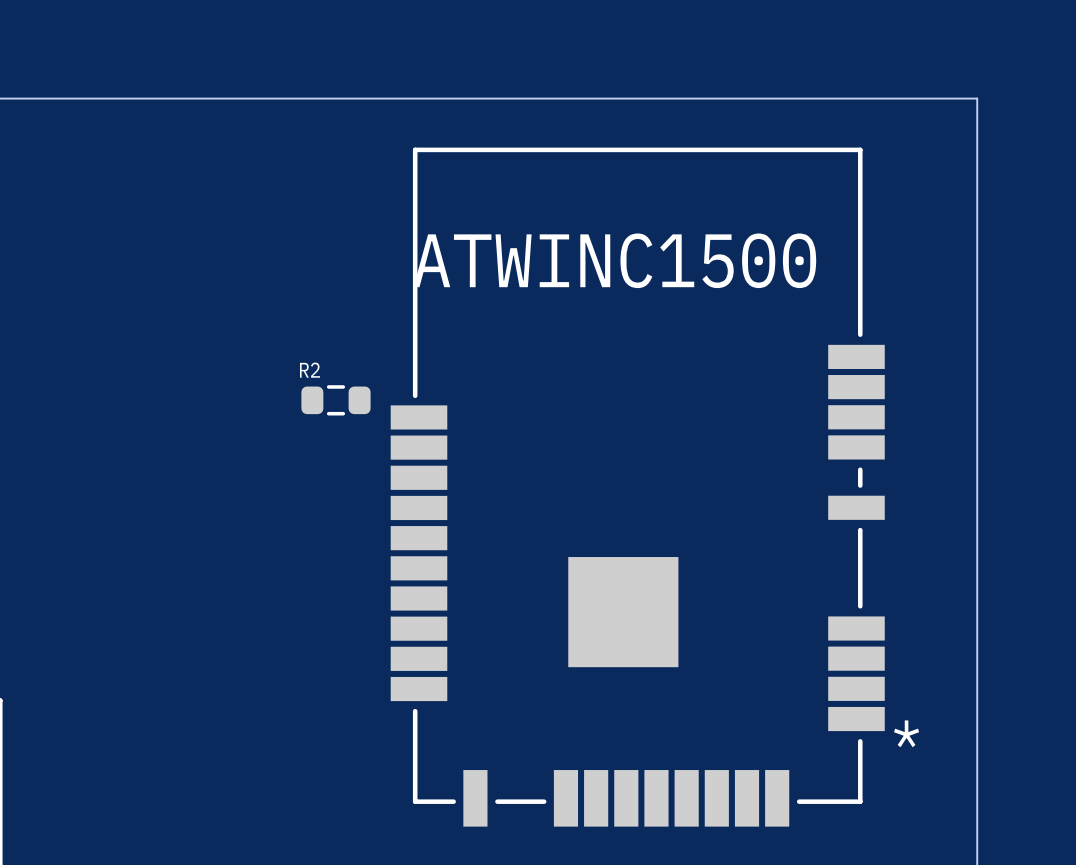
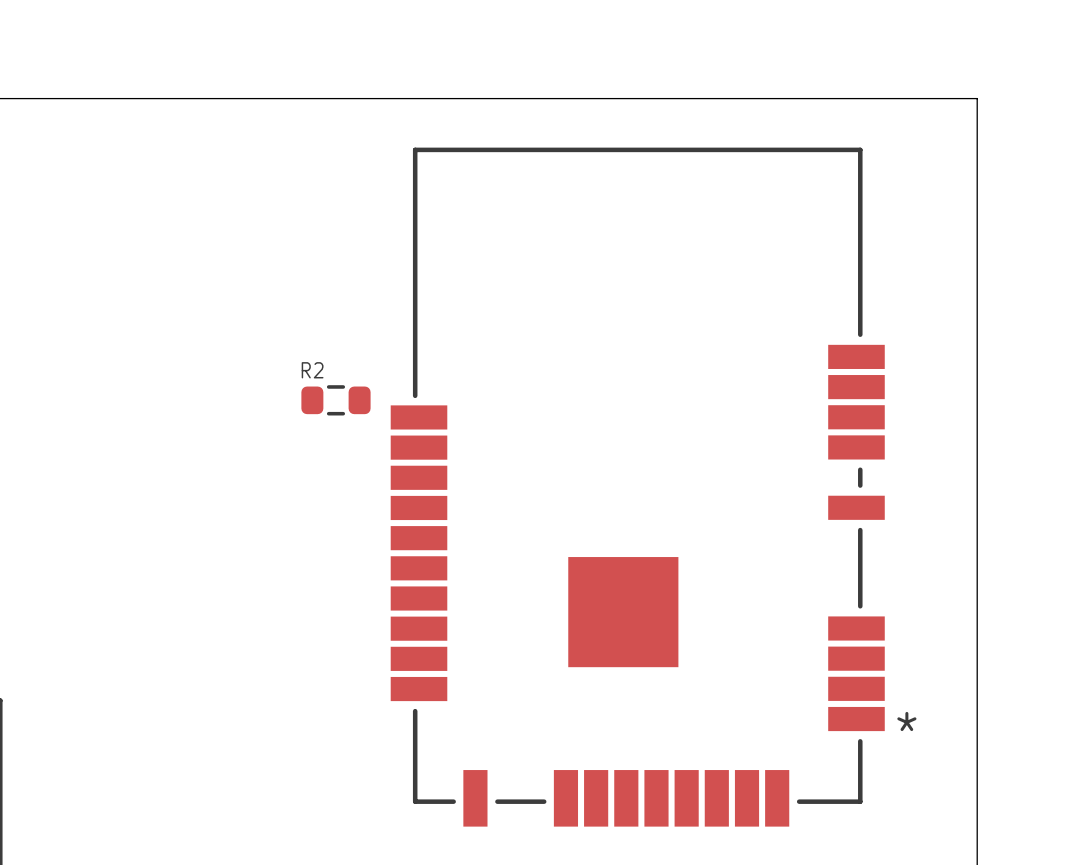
text: ATWINC1500 (614, 260) -> none

